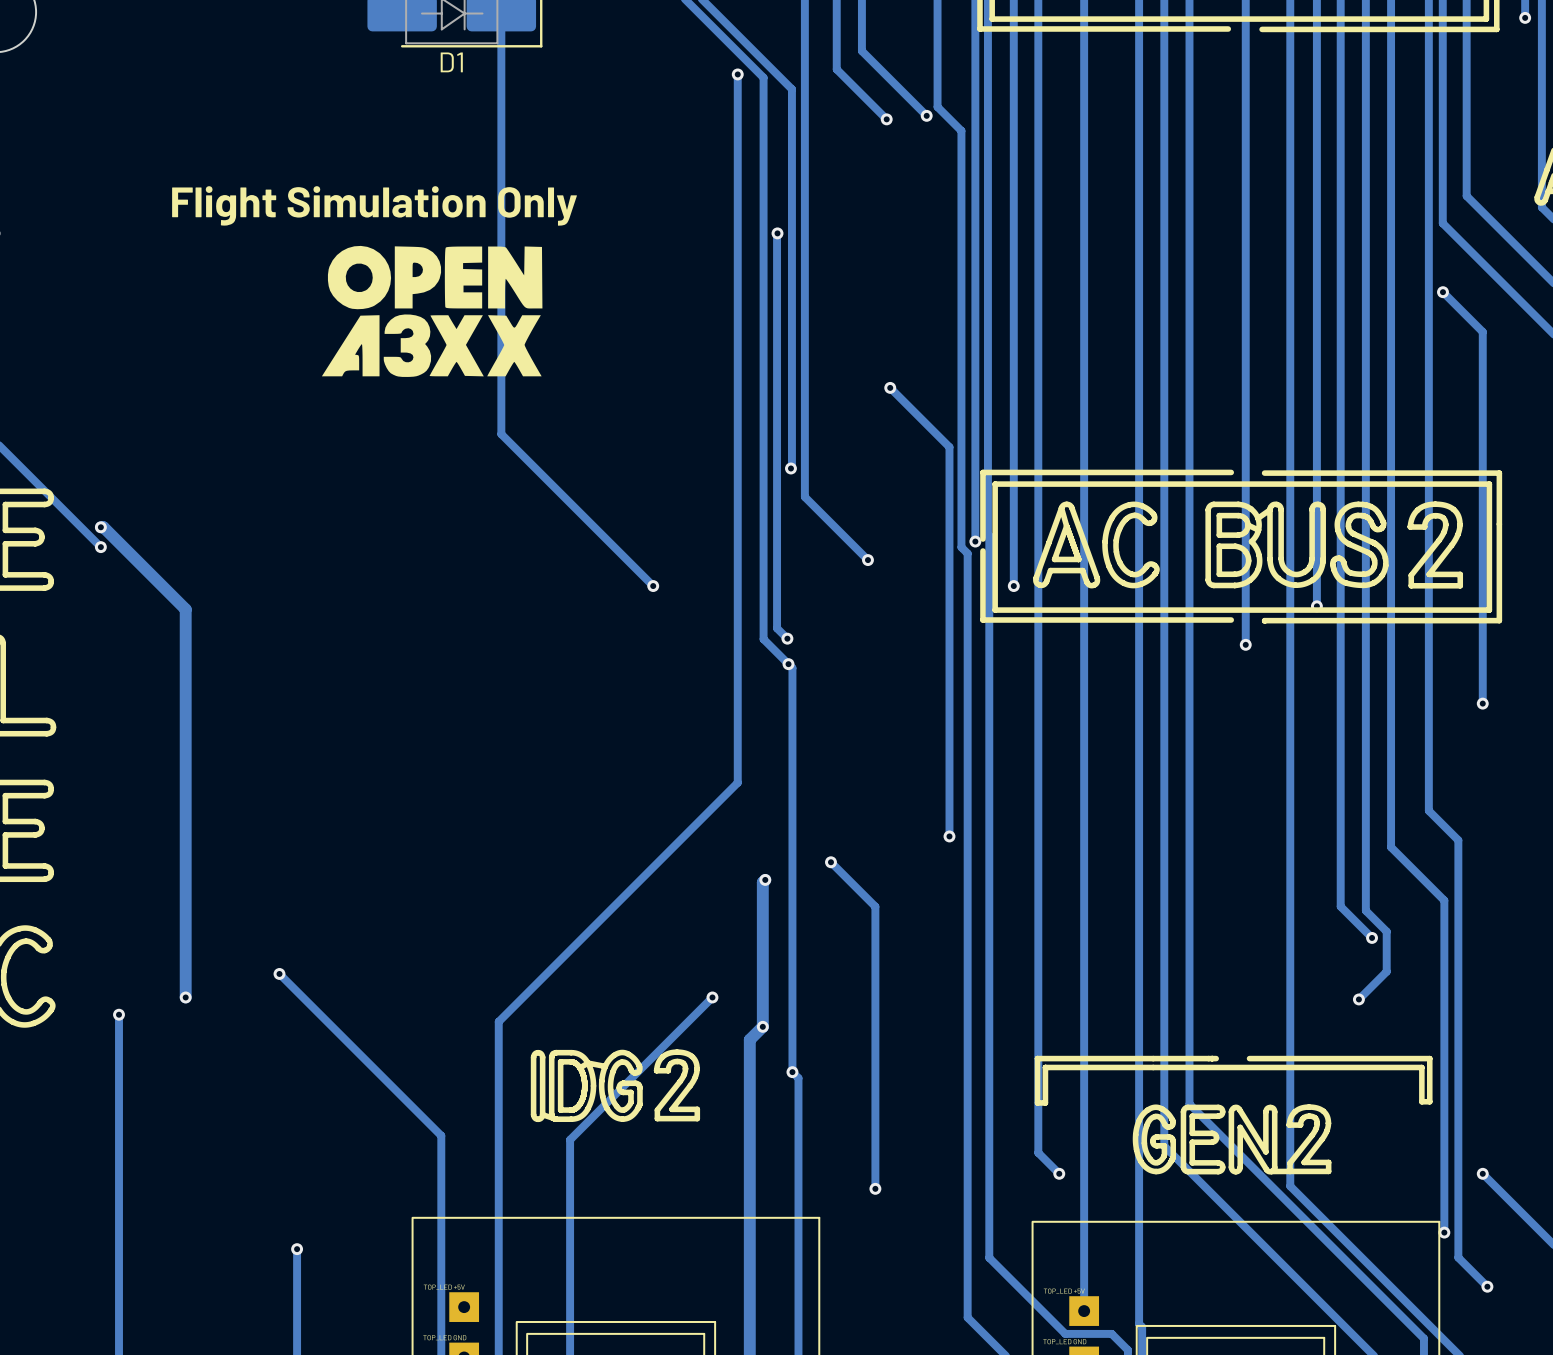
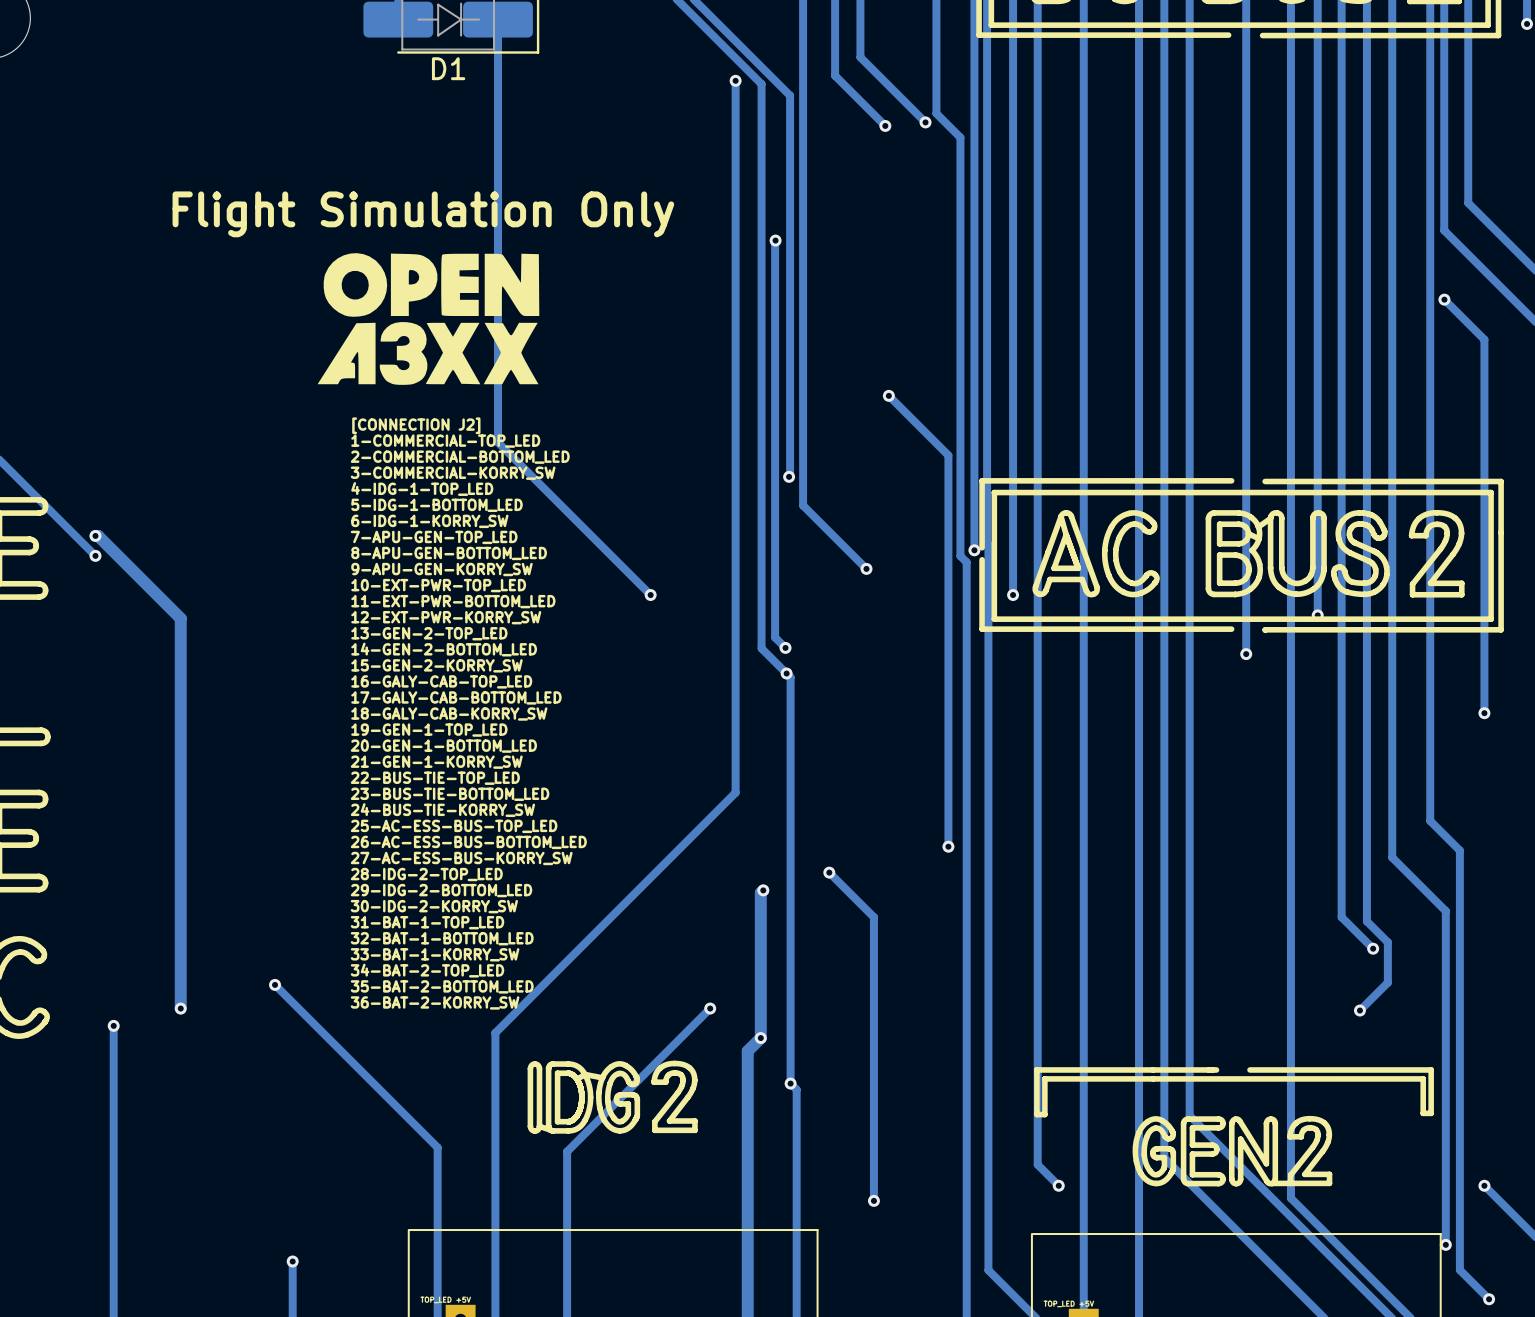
text: none -> [CONNECTION J2] (416, 425)
text: none -> 1-COMMERCIAL-TOP_LED (445, 441)
text: none -> 2-COMMERCIAL-BOTTOM_LED (460, 457)
text: none -> 3-COMMERCIAL-KORRY_SW (453, 473)
text: none -> 4-IDG-1-TOP_LED (422, 489)
text: none -> 5-IDG-1-BOTTOM_LED (436, 505)
text: none -> 6-IDG-1-KORRY_SW (429, 521)
text: none -> 7-APU-GEN-TOP_LED (434, 537)
text: none -> 8-APU-GEN-BOTTOM_LED (449, 553)
text: none -> 9-APU-GEN-KORRY_SW (441, 569)
text: none -> 10-EXT-PWR-TOP_LED (438, 585)
text: none -> 11-EXT-PWR-BOTTOM_LED (453, 601)
text: none -> 12-EXT-PWR-KORRY_SW (446, 617)
text: none -> 13-GEN-2-TOP_LED (429, 633)
text: none -> 14-GEN-2-BOTTOM_LED (444, 649)
text: none -> 15-GEN-2-KORRY_SW (436, 665)
text: none -> 16-GALY-CAB-TOP_LED (441, 681)
text: none -> 17-GALY-CAB-BOTTOM_LED (456, 697)
text: none -> 18-GALY-CAB-KORRY_SW (449, 714)
text: none -> 19-GEN-1-TOP_LED (429, 730)
text: none -> 20-GEN-1-BOTTOM_LED (443, 746)
text: none -> 21-GEN-1-KORRY_SW (436, 762)
text: none -> 22-BUS-TIE-TOP_LED (435, 778)
text: none -> 23-BUS-TIE-BOTTOM_LED (450, 794)
text: none -> 24-BUS-TIE-KORRY_SW (442, 810)
text: none -> 25-AC-ESS-BUS-TOP_LED (454, 826)
text: none -> 26-AC-ESS-BUS-BOTTOM_LED (468, 842)
text: none -> 27-AC-ESS-BUS-KORRY_SW (461, 858)
text: none -> 28-IDG-2-TOP_LED (426, 874)
text: none -> 29-IDG-2-BOTTOM_LED (441, 890)
text: none -> 30-IDG-2-KORRY_SW (434, 906)
text: none -> 31-BAT-1-TOP_LED (427, 922)
text: none -> 32-BAT-1-BOTTOM_LED (442, 938)
text: none -> 33-BAT-1-KORRY_SW (435, 954)
text: none -> 34-BAT-2-TOP_LED (427, 970)
text: none -> 35-BAT-2-BOTTOM_LED (442, 986)
text: none -> 36-BAT-2-KORRY_SW (435, 1002)

